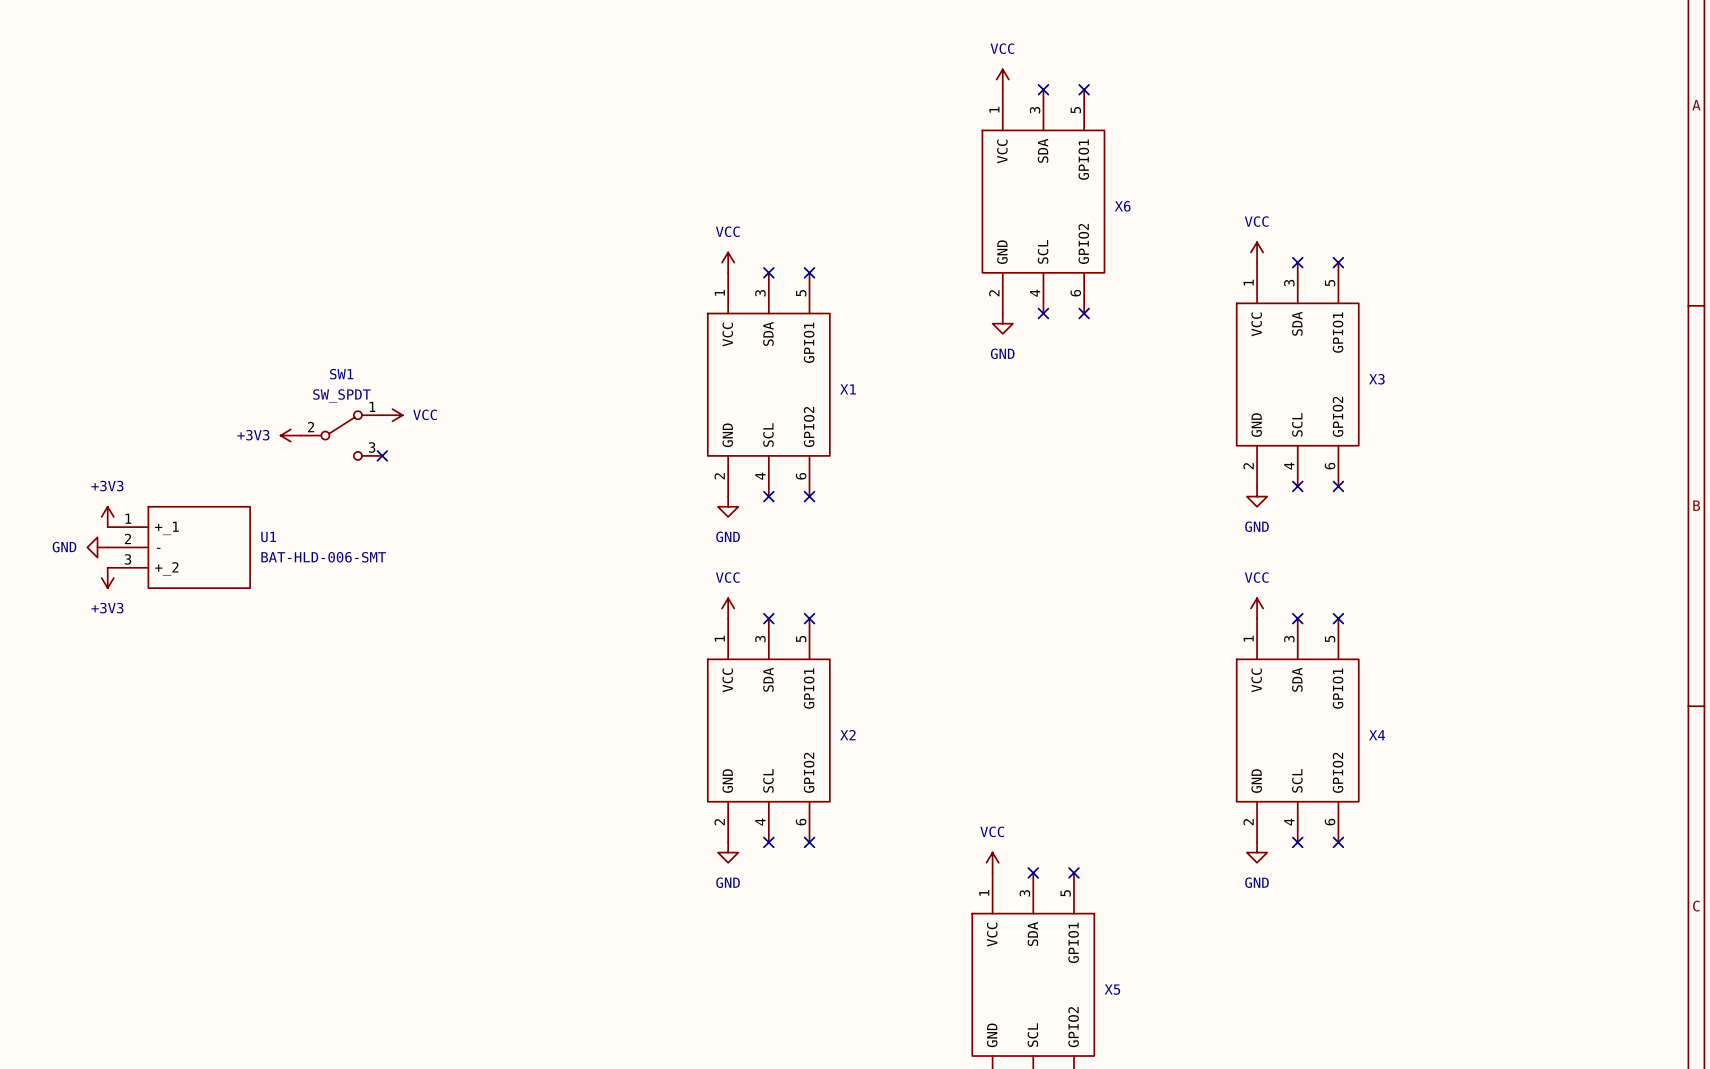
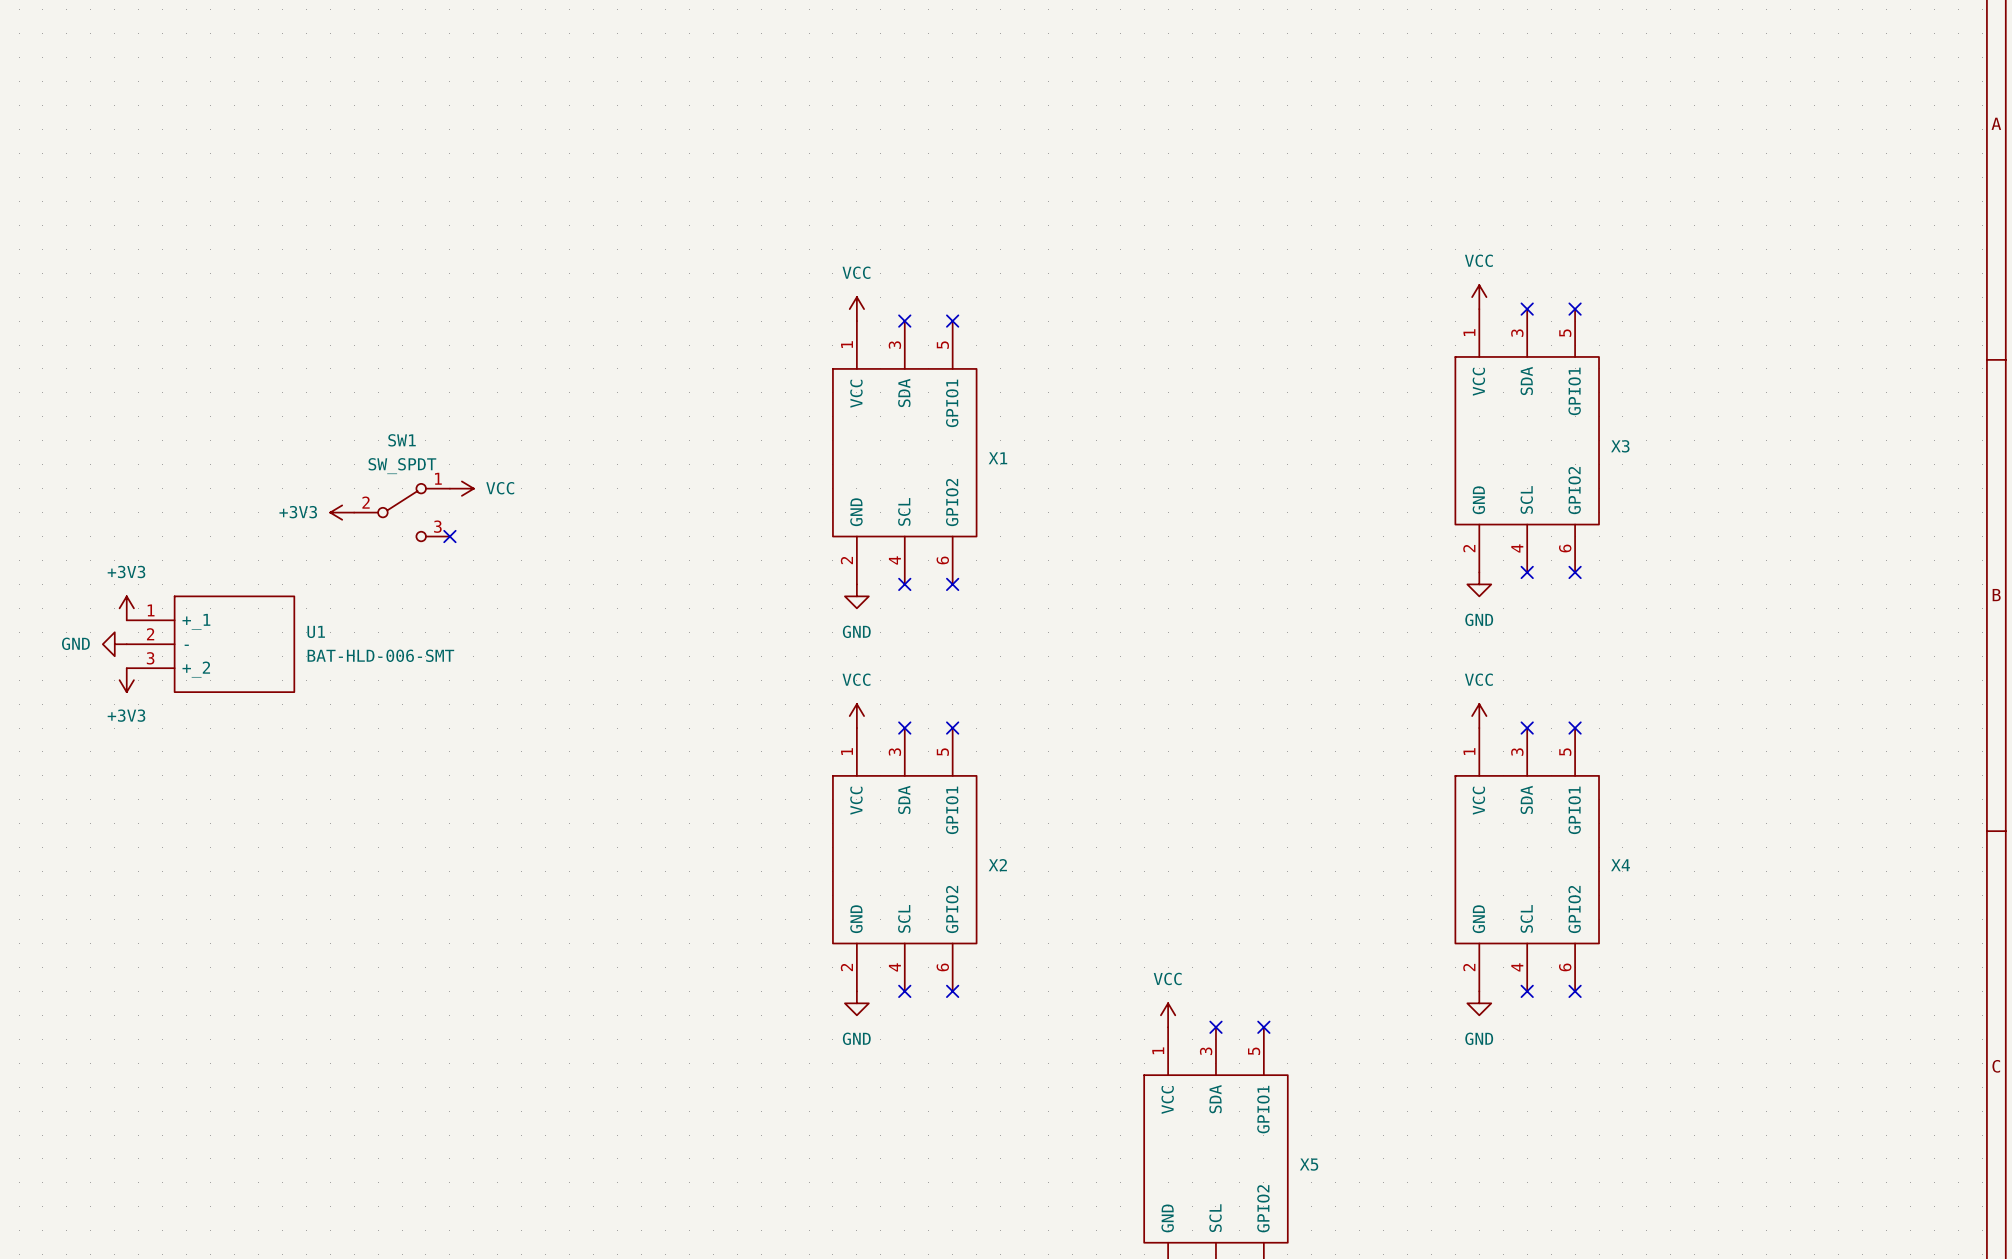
power symbol: VCC (1002, 79) -> none
no-connect mark: (1043, 89) -> none
no-connect mark: (1084, 89) -> none
X6: (1043, 201) -> none
no-connect mark: (1043, 313) -> none
no-connect mark: (1084, 313) -> none
power symbol: GND (1002, 323) -> none

